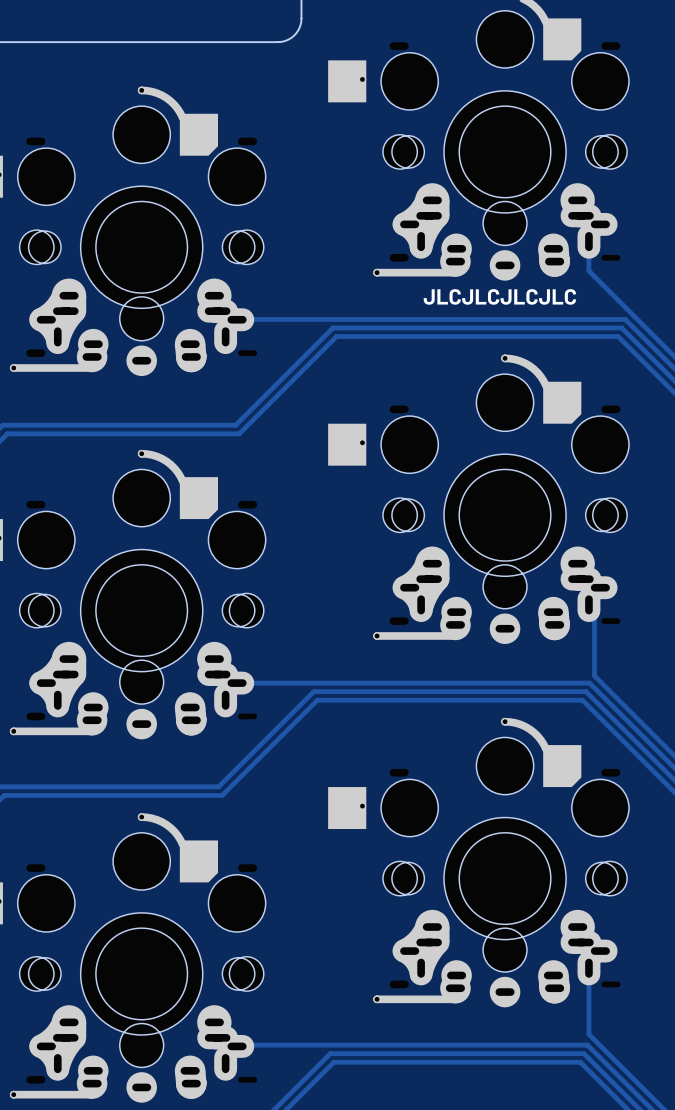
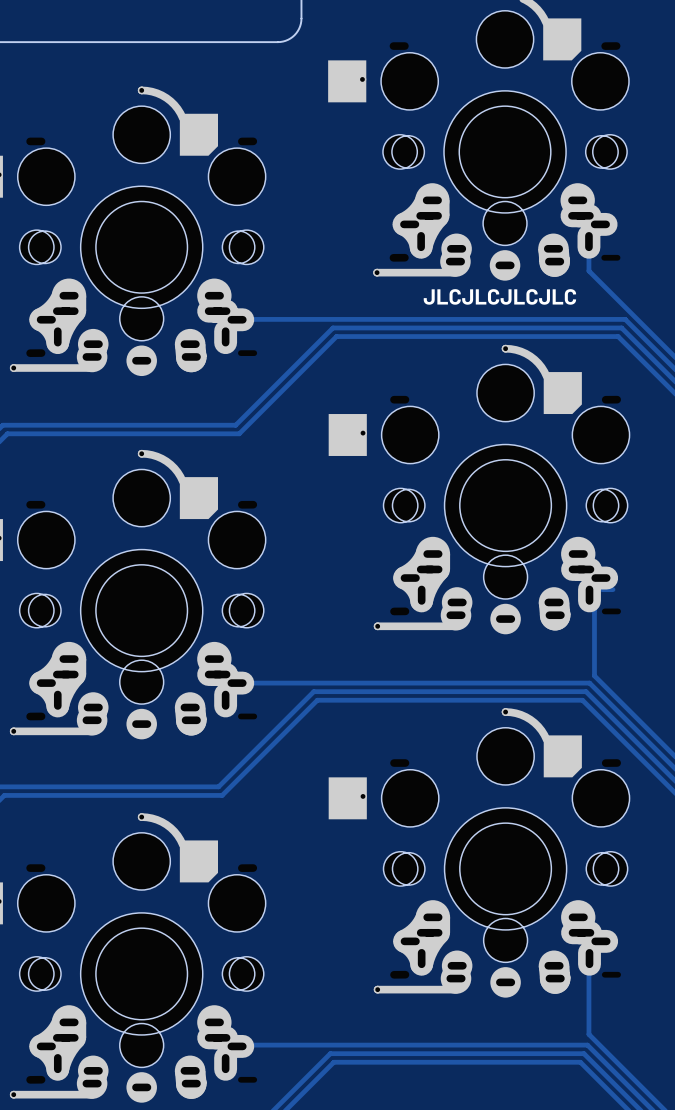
part footprint: [328, 354, 630, 644] -> [328, 344, 630, 635]
part footprint: [328, 717, 630, 1008] -> [328, 708, 630, 998]

